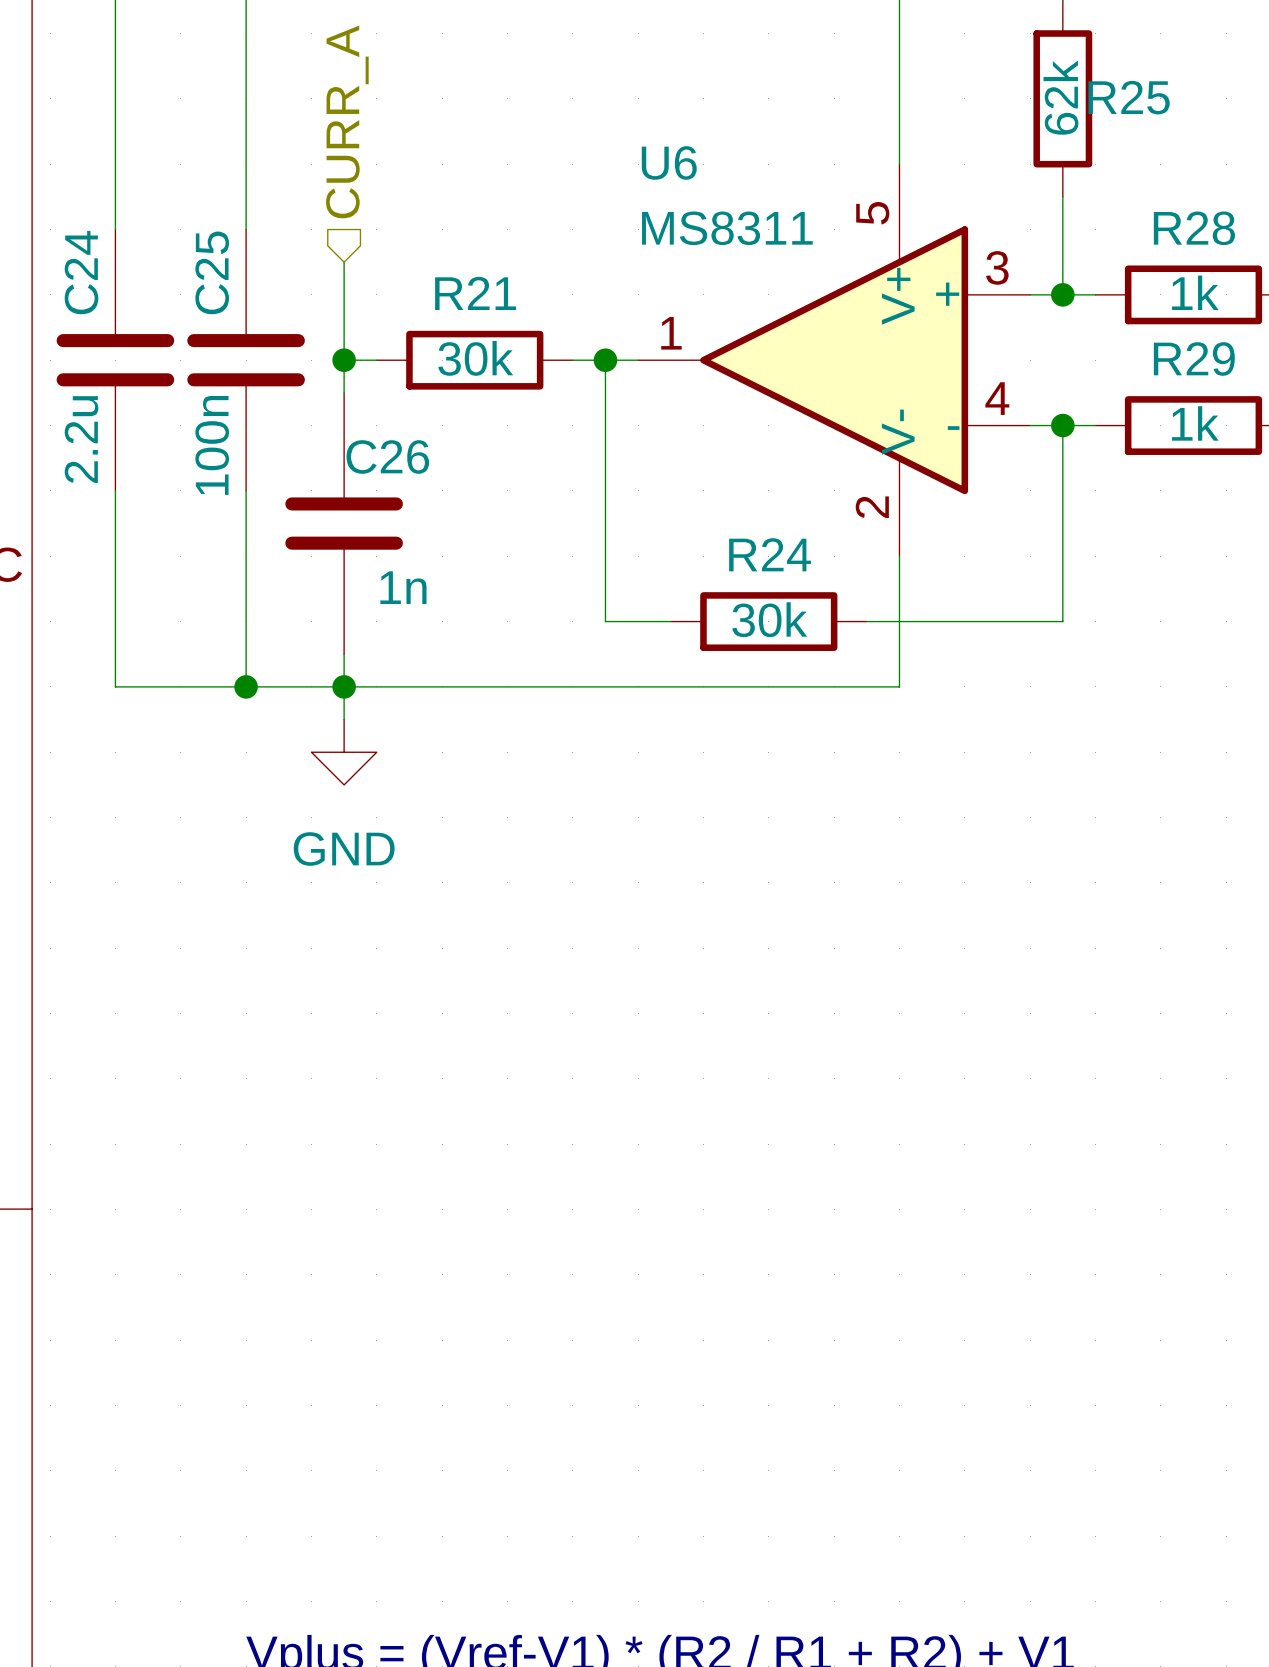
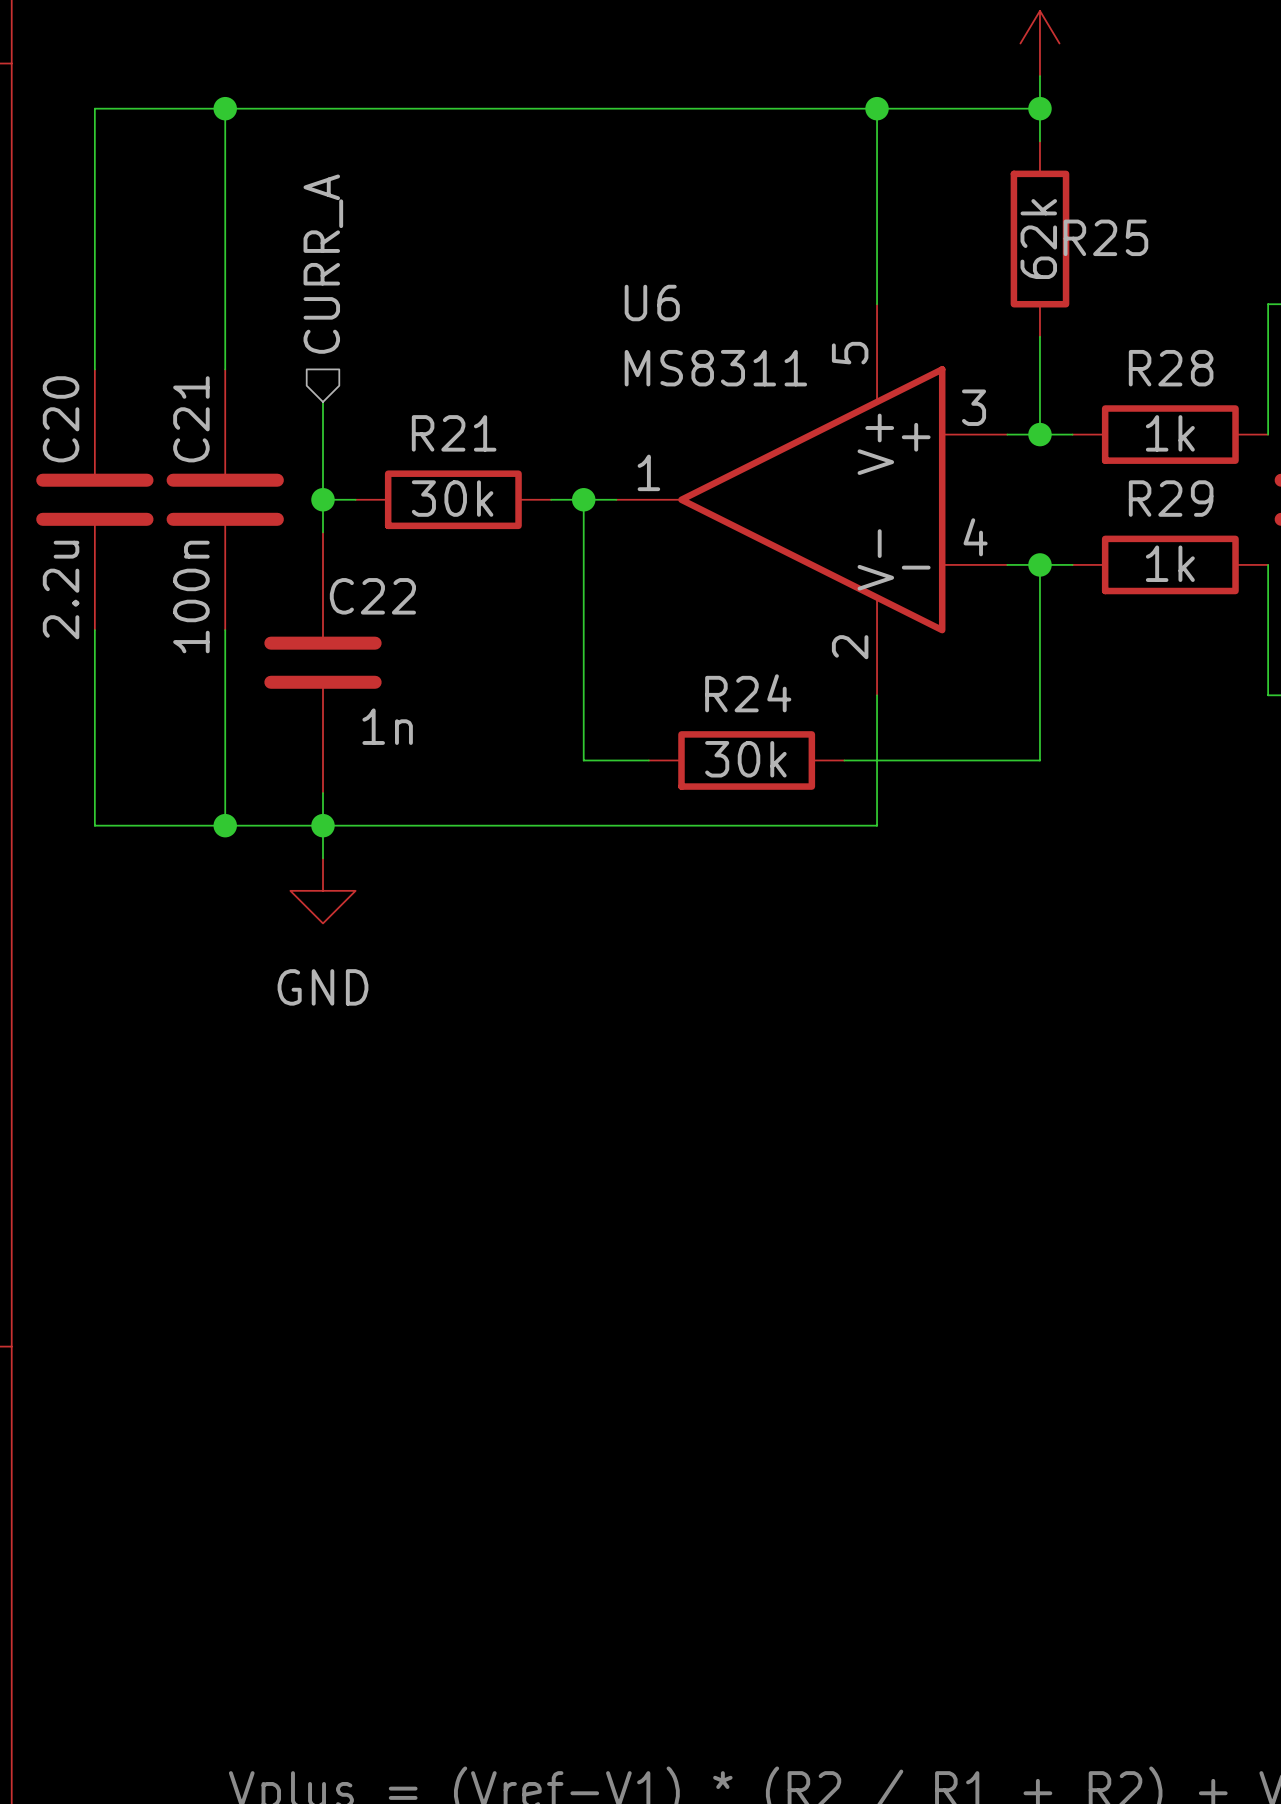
C24 name: C24 (81, 272) -> C20 (61, 419)
C25 name: C25 (212, 272) -> C21 (191, 419)
C26 name: C26 (387, 456) -> C22 (372, 596)

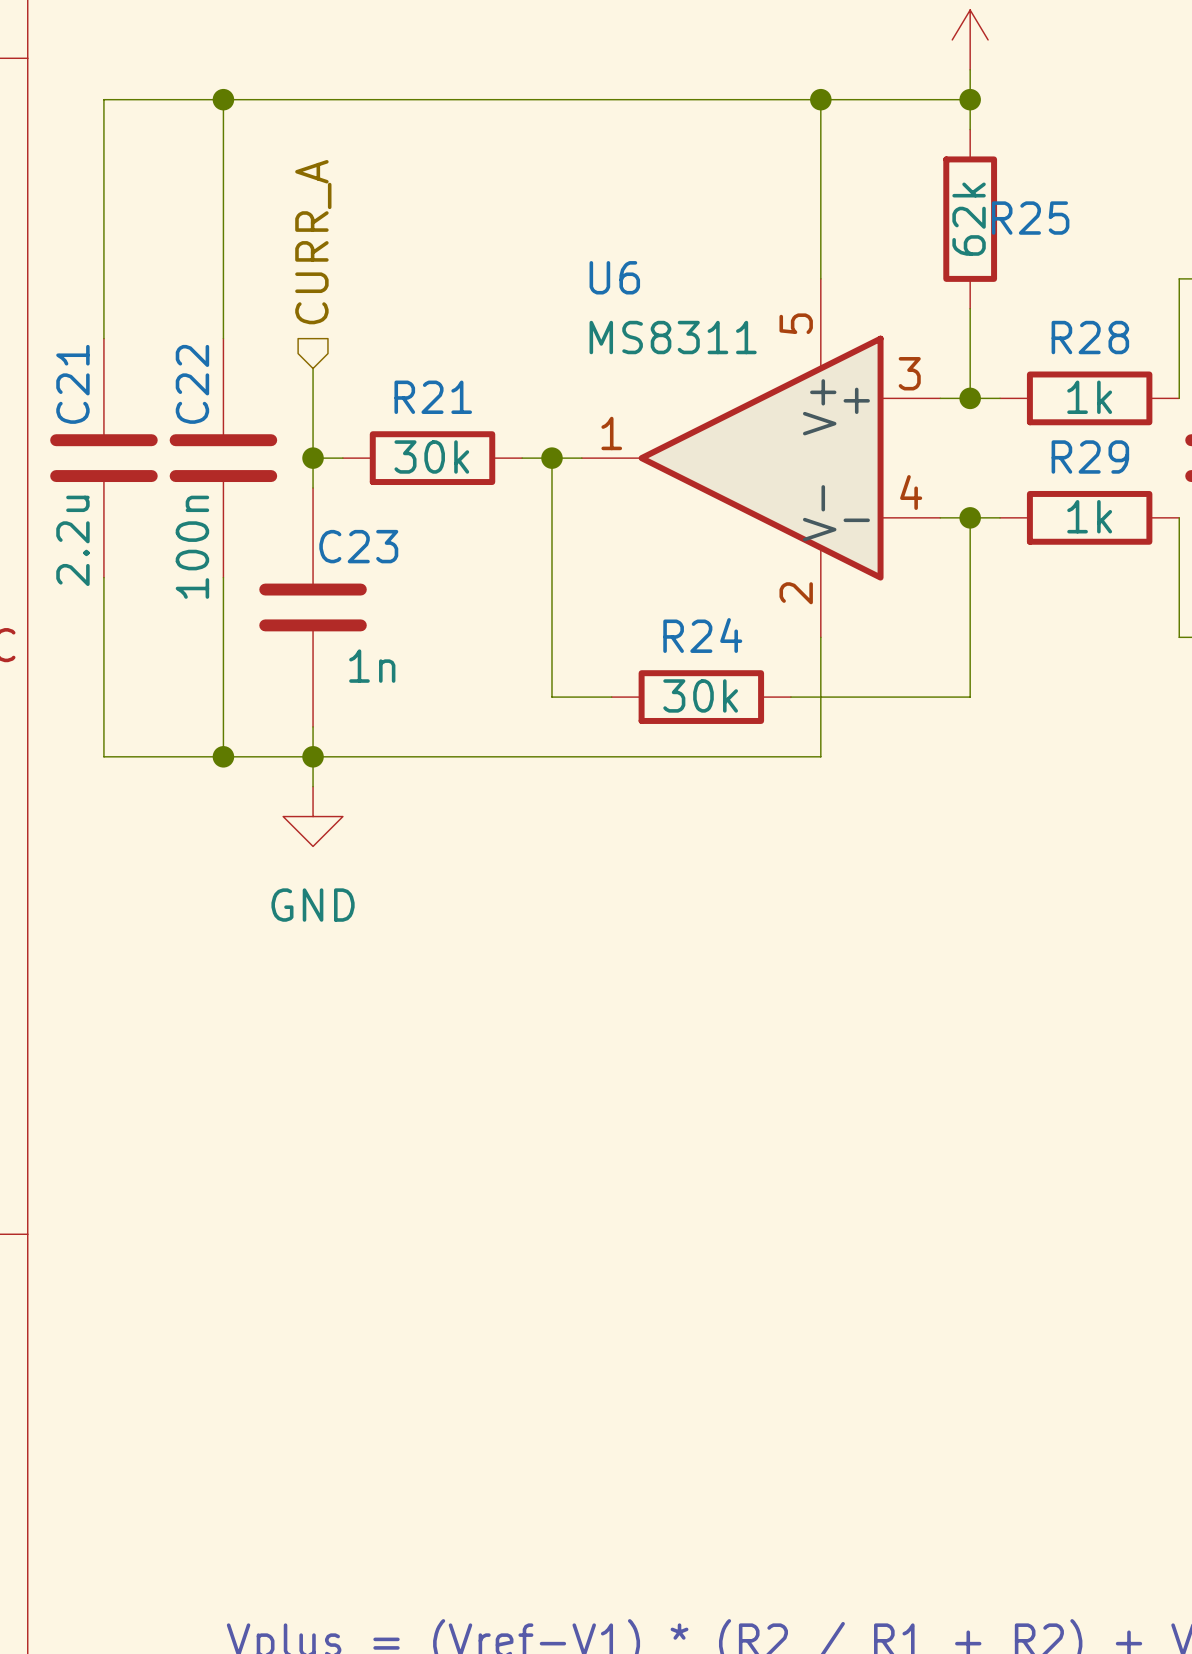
C20 name: C20 (61, 419) -> C21 (72, 384)
C21 name: C21 (191, 419) -> C22 (192, 384)
C22 name: C22 (372, 596) -> C23 (358, 546)

